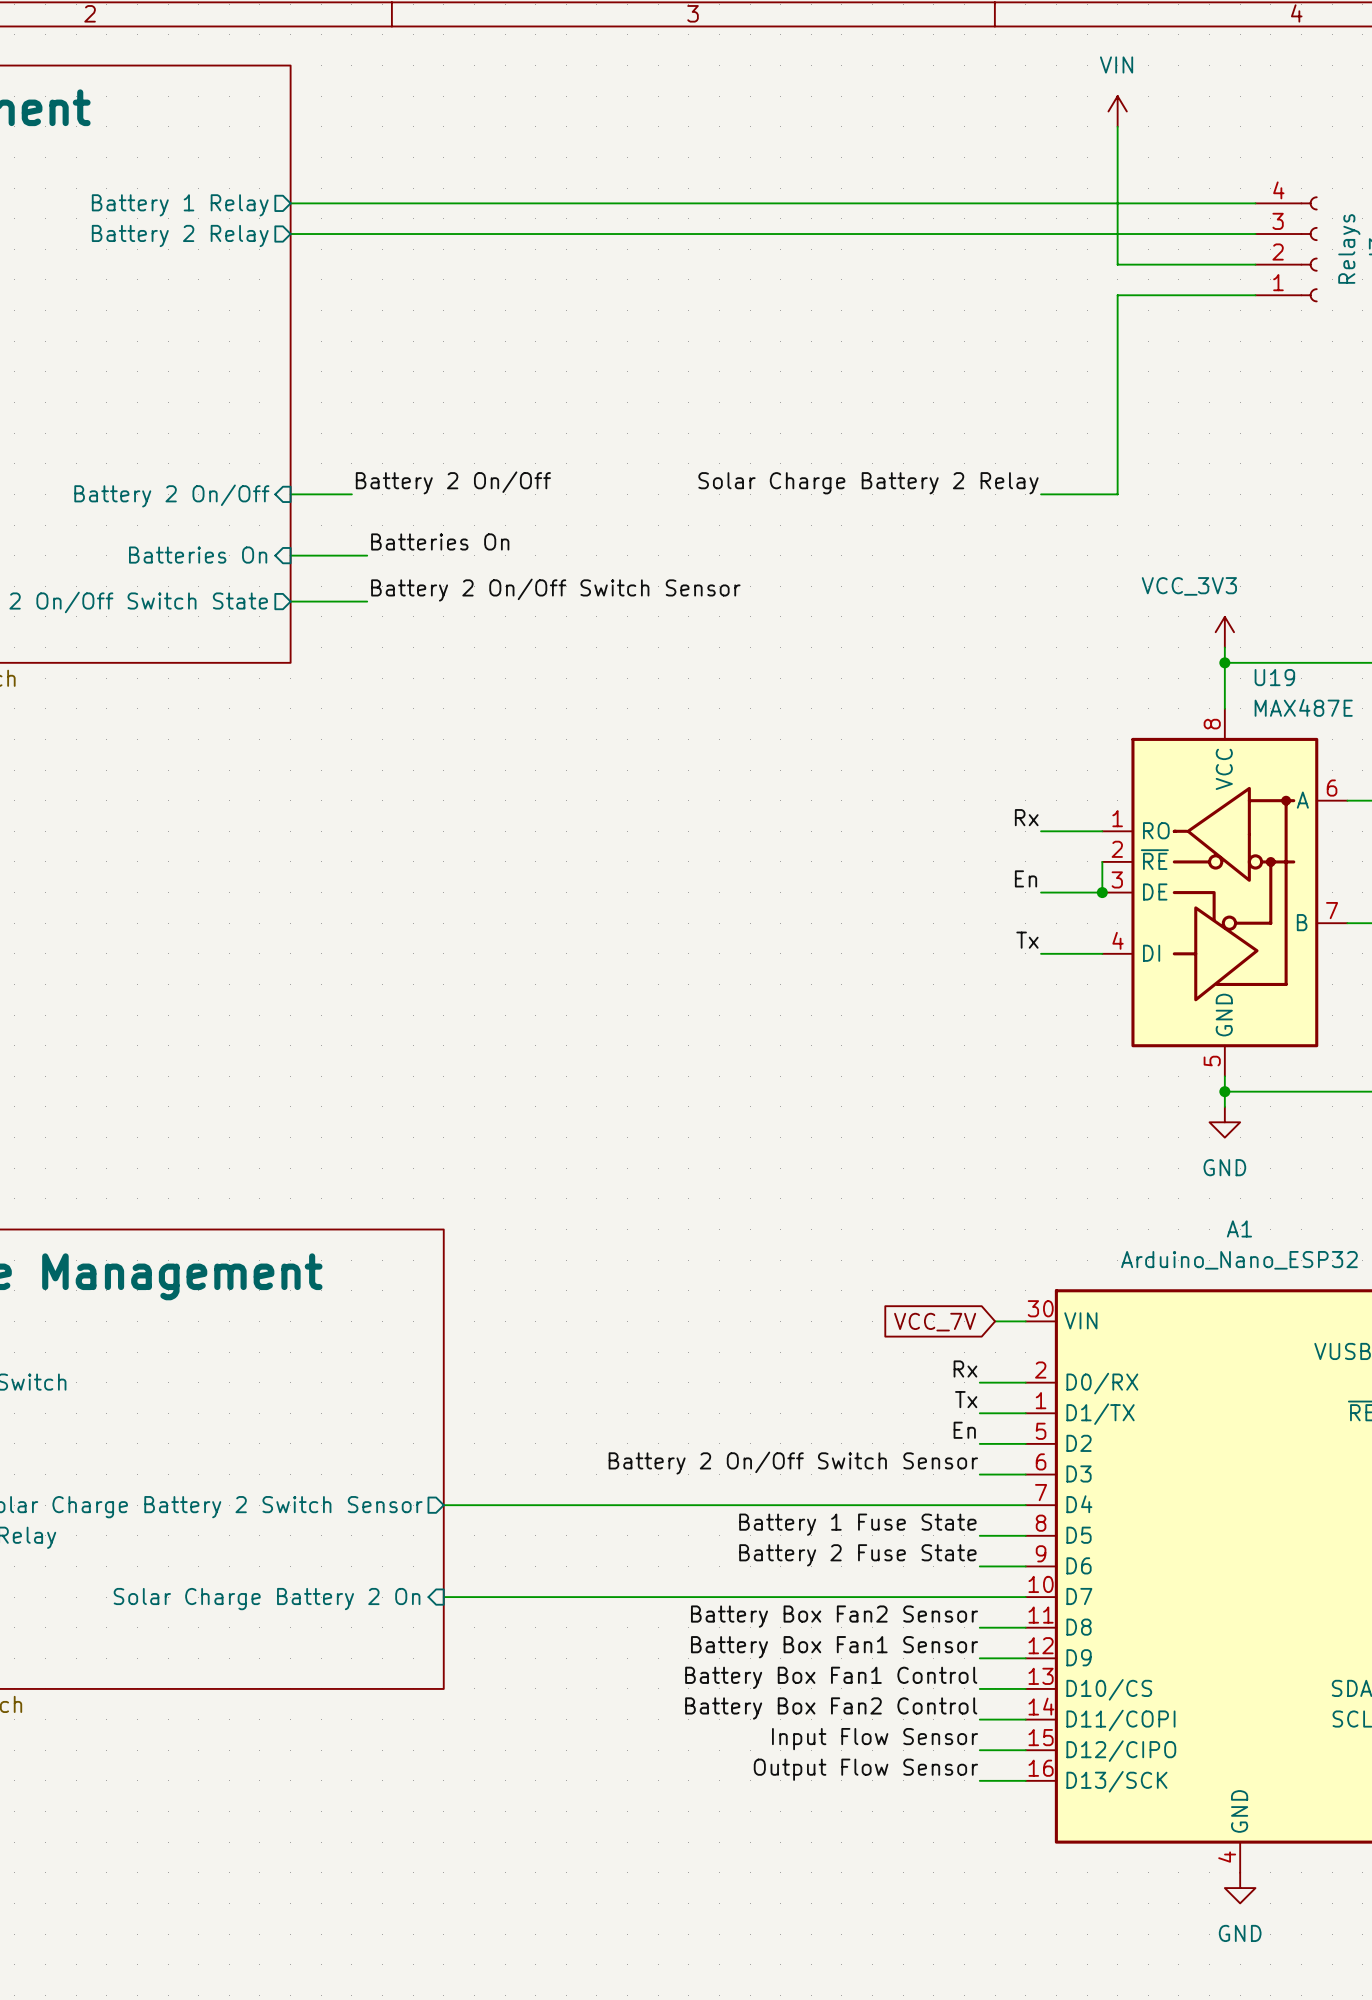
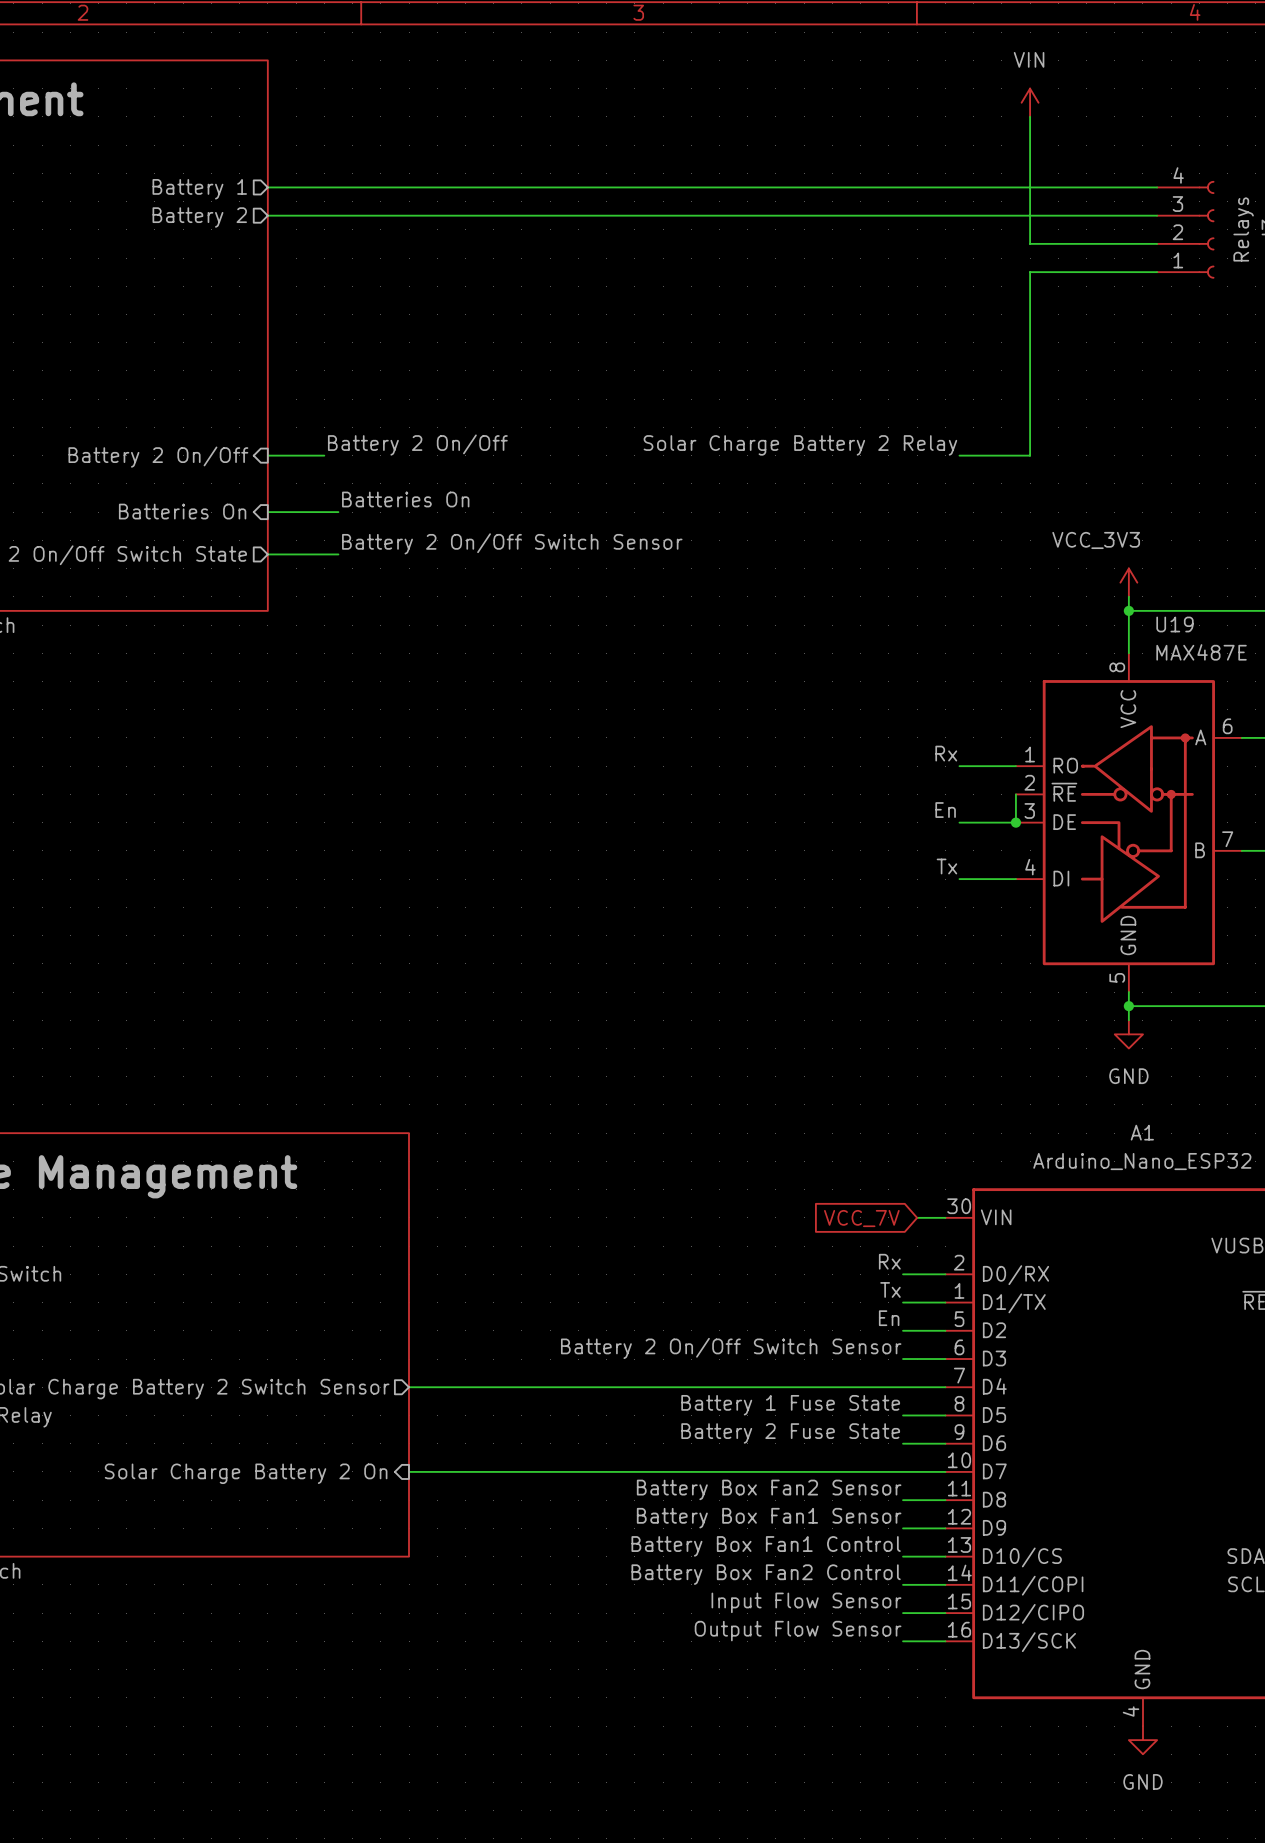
sheet pin: Battery 1 Relay (180, 205) -> Battery 1 (199, 189)
sheet pin: Battery 2 Relay (180, 235) -> Battery 2 (199, 217)

